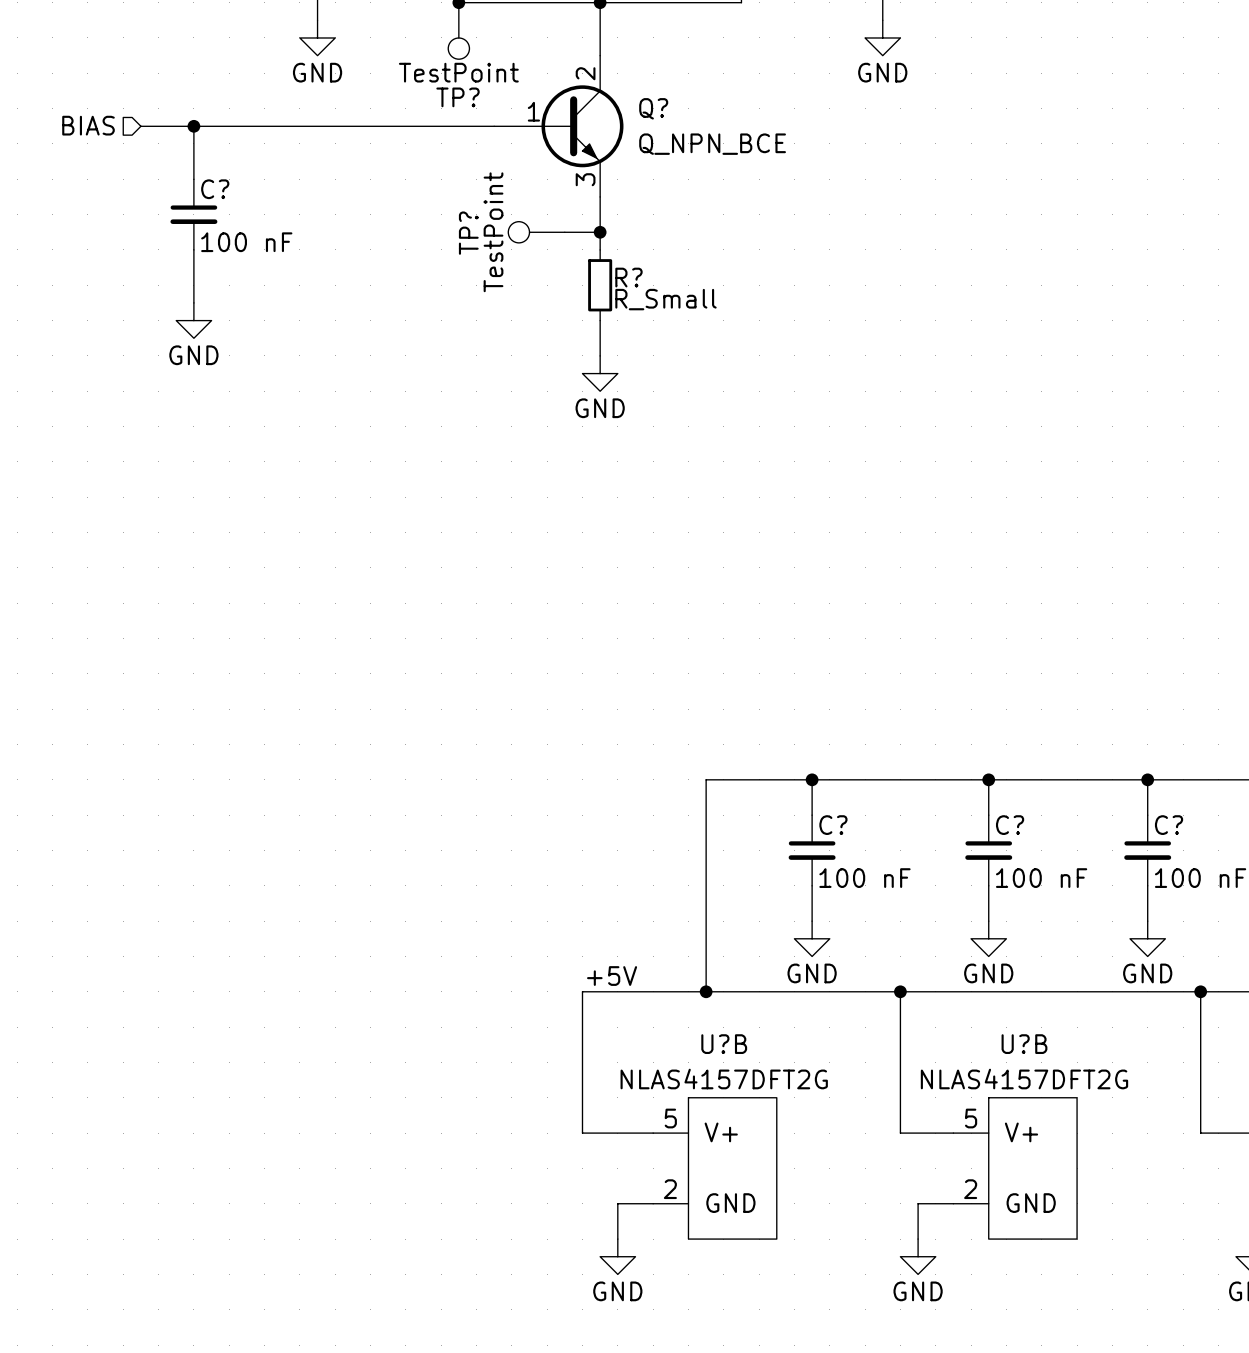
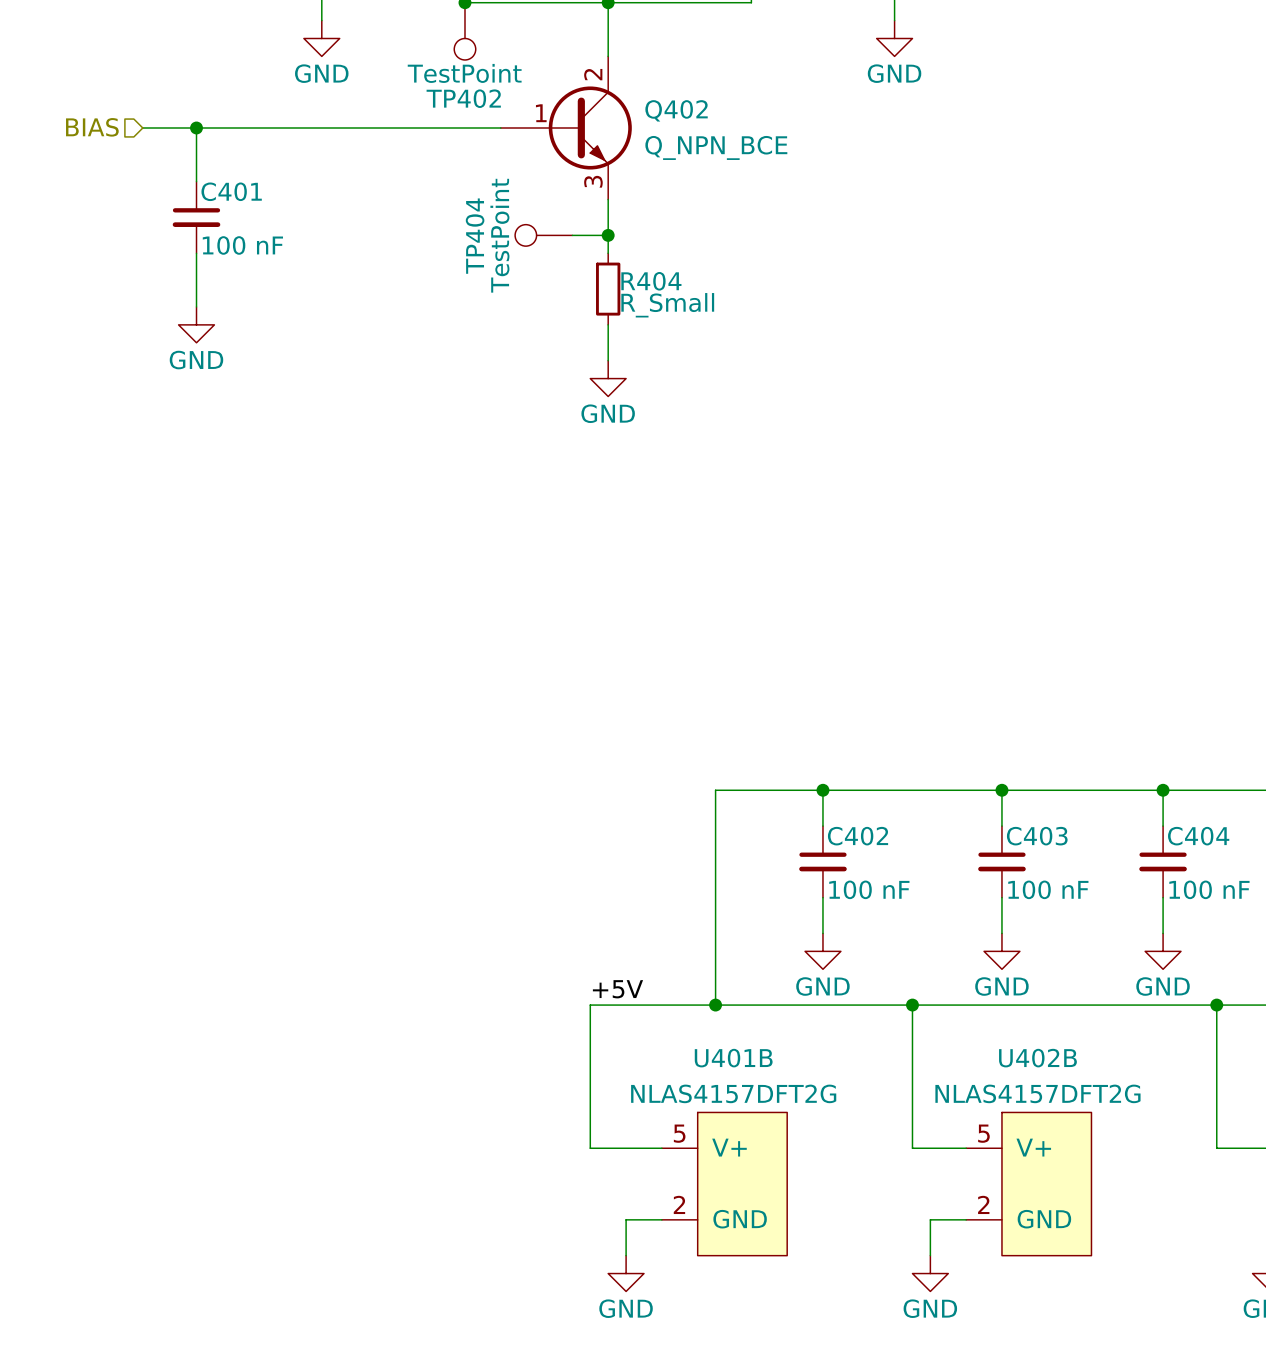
TP? name: TP? (458, 97) -> TP402 (463, 98)
Q? name: Q? (653, 108) -> Q402 (676, 110)
C? name: C? (215, 189) -> C401 (231, 191)
TP? name: TP? (468, 233) -> TP404 (475, 236)
R? name: R? (628, 277) -> R404 (651, 281)
C? name: C? (833, 825) -> C402 (858, 836)
C? name: C? (1010, 825) -> C403 (1037, 836)
C? name: C? (1169, 825) -> C404 (1198, 836)
U?B name: U?B (724, 1044) -> U401B (733, 1058)
U?B name: U?B (1024, 1044) -> U402B (1037, 1058)

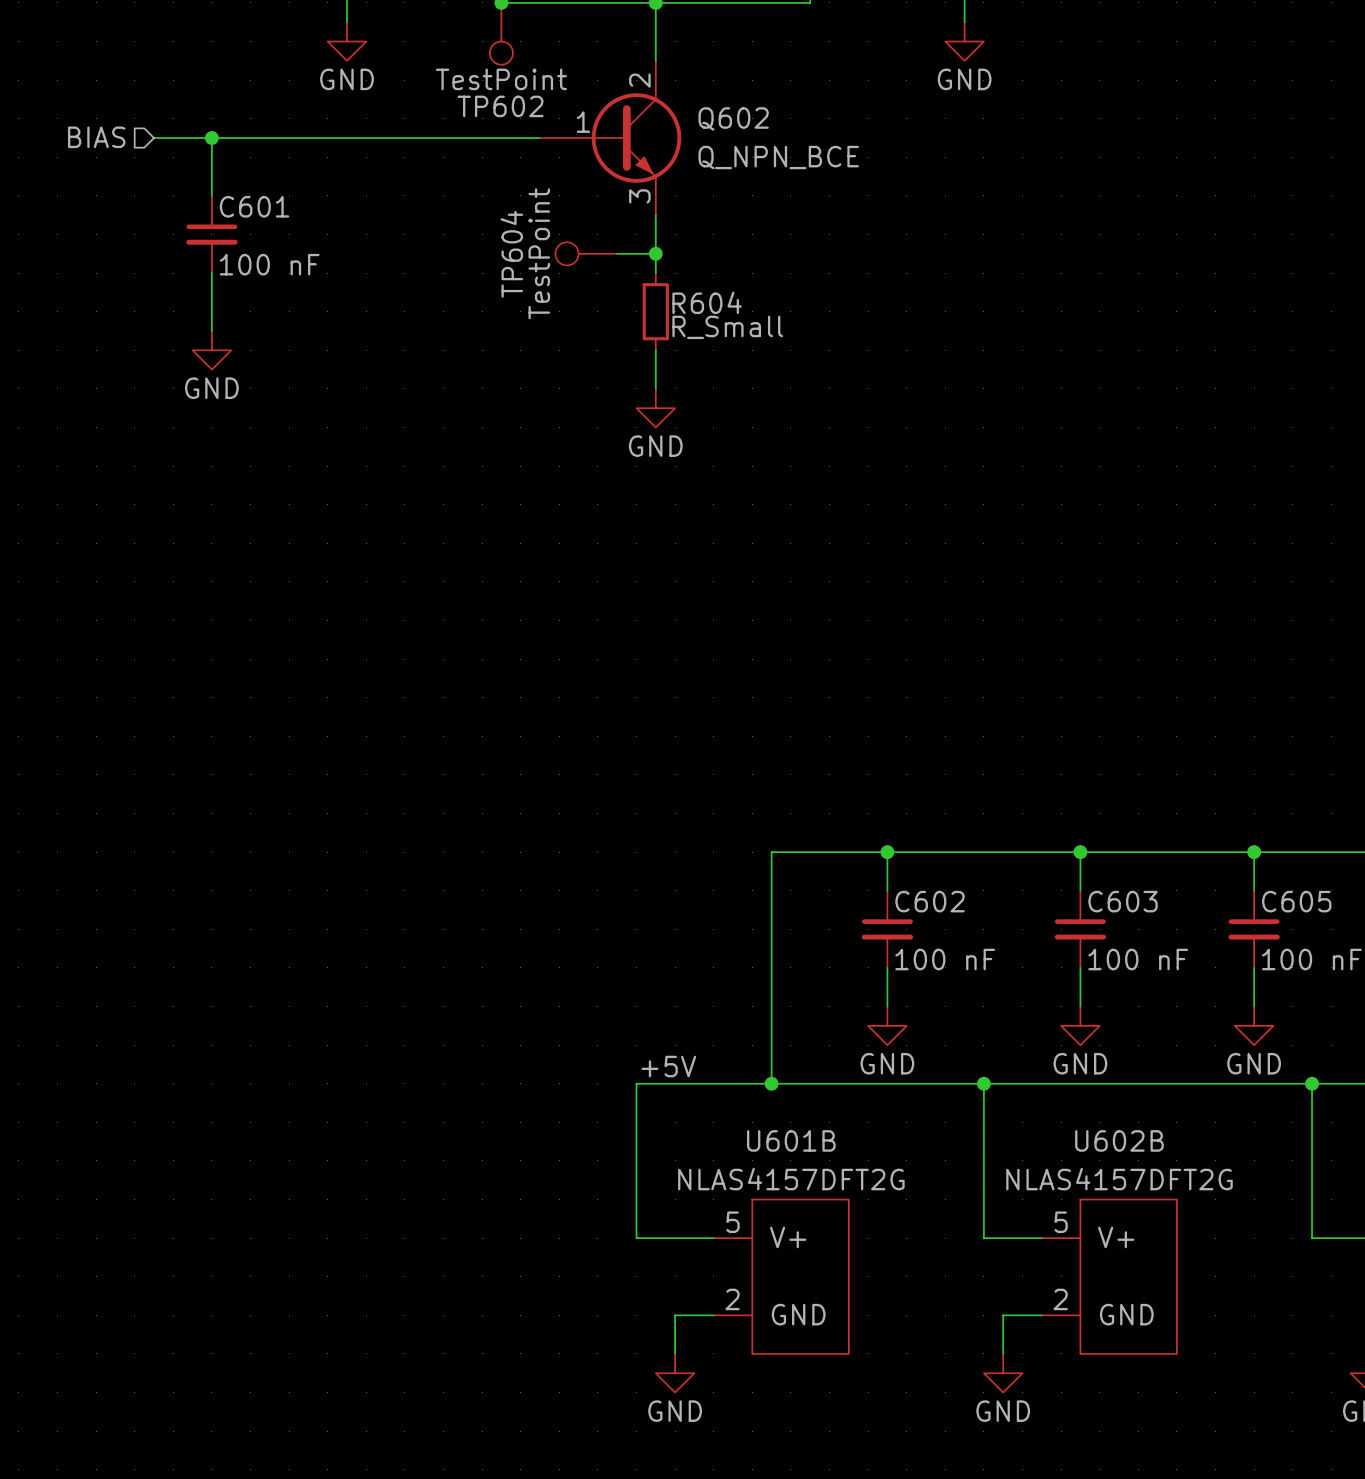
TP402 name: TP402 (463, 98) -> TP602 (500, 106)
Q402 name: Q402 (676, 110) -> Q602 (733, 118)
C401 name: C401 (231, 191) -> C601 (254, 206)
TP404 name: TP404 (475, 236) -> TP604 (511, 254)
R404 name: R404 (651, 281) -> R604 (707, 302)
C402 name: C402 (858, 836) -> C602 (930, 901)
C403 name: C403 (1037, 836) -> C603 (1123, 901)
C404 name: C404 (1198, 836) -> C605 (1296, 901)
U401B name: U401B (733, 1058) -> U601B (791, 1140)
U402B name: U402B (1037, 1058) -> U602B (1119, 1140)

